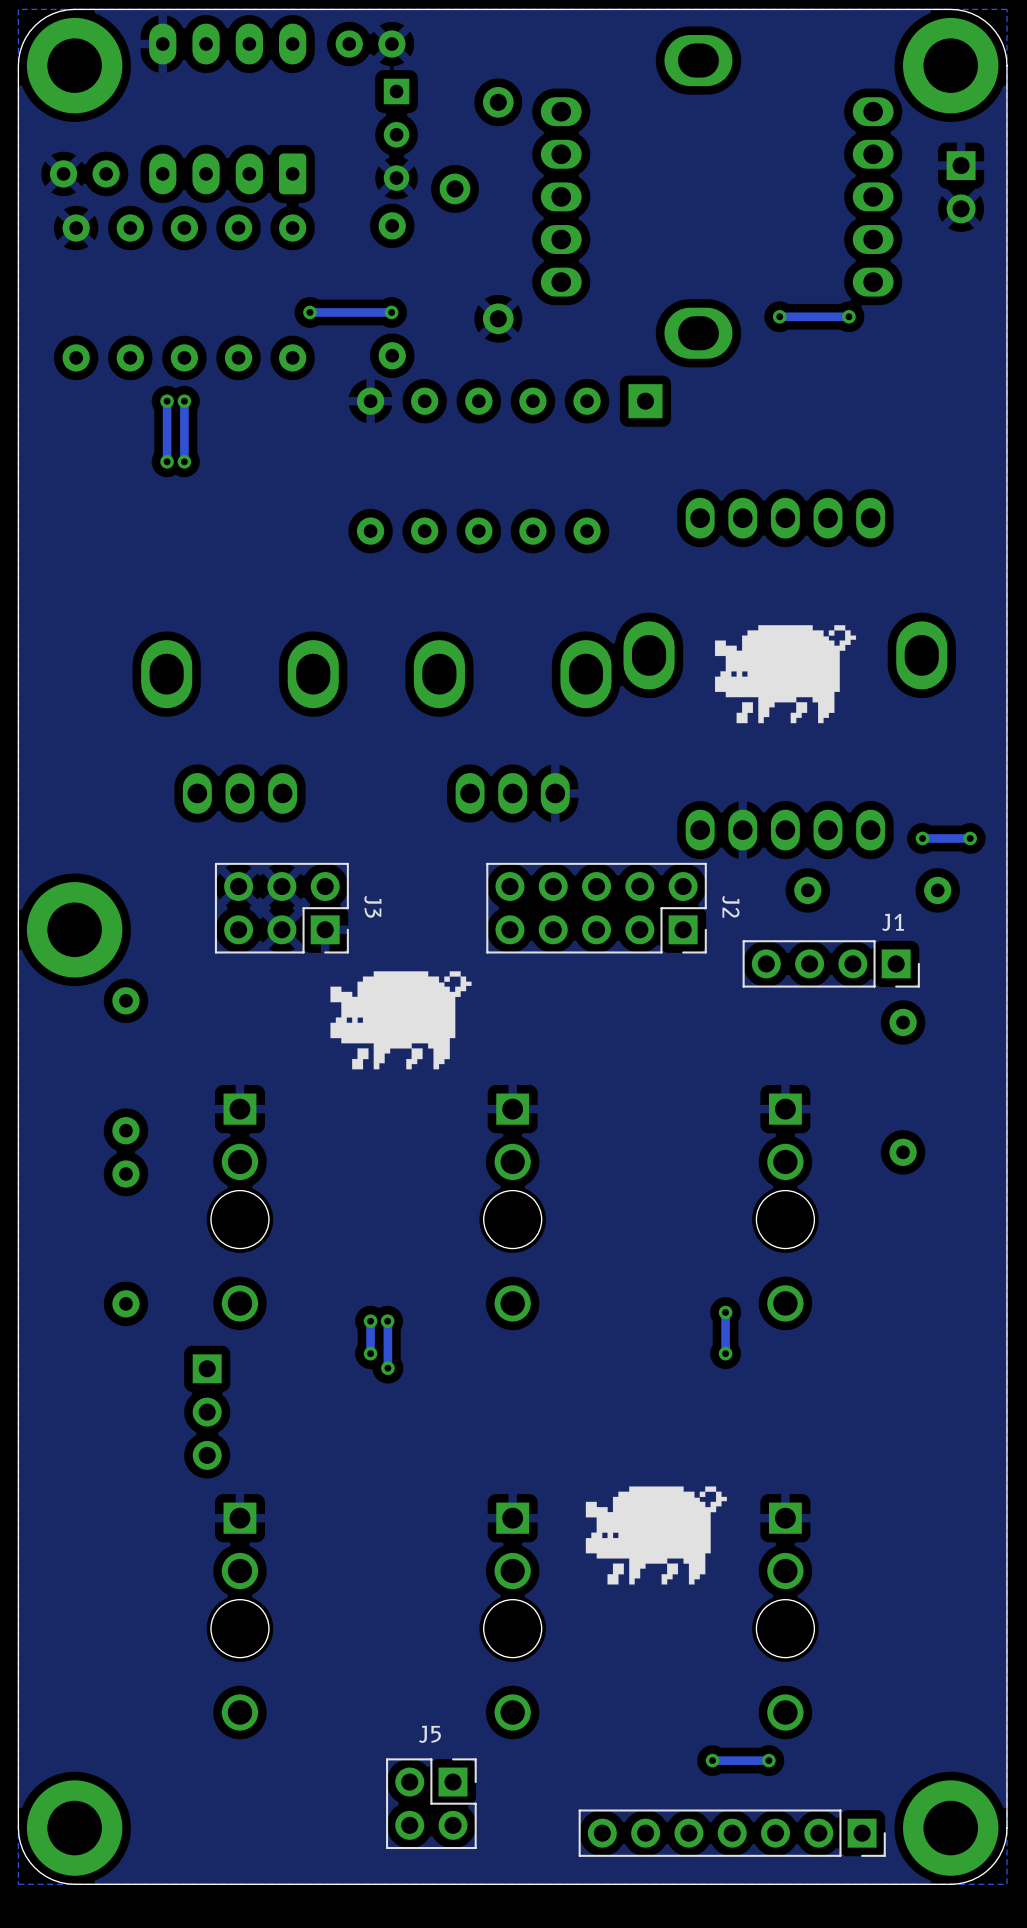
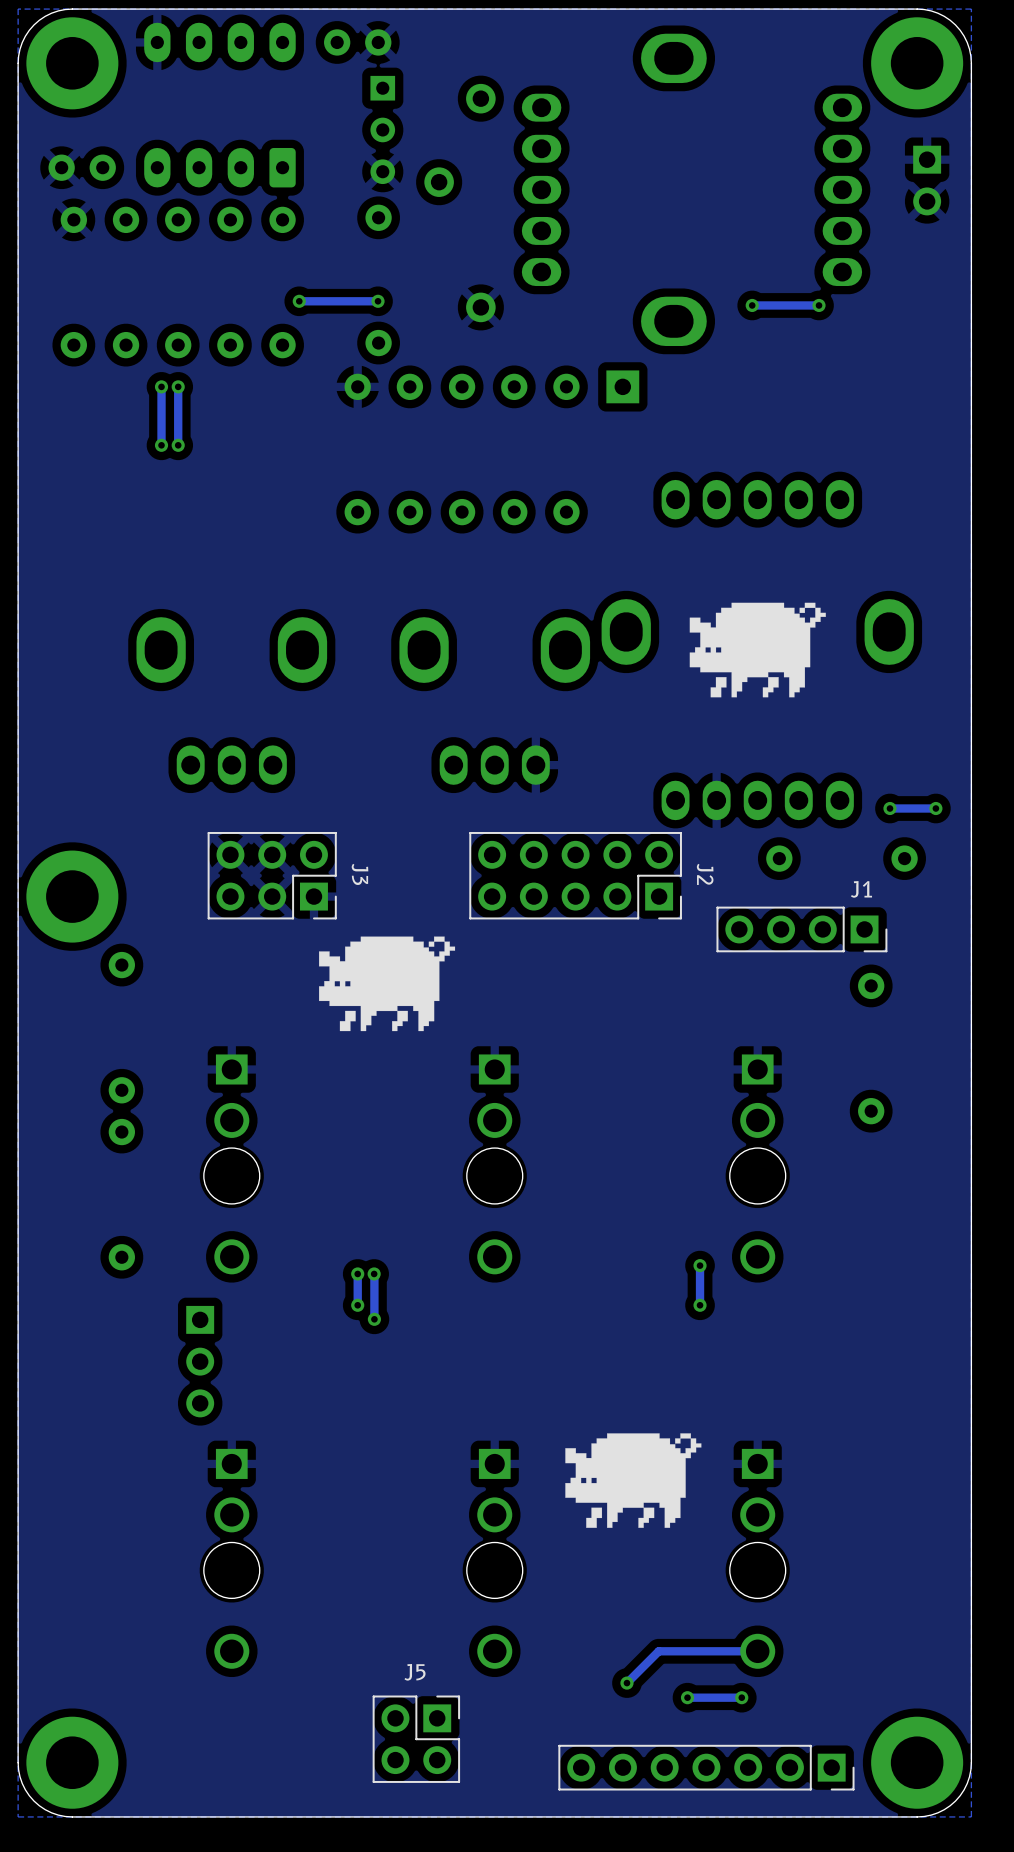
track: none -> (757, 1651) (658, 1651) (626, 1683)
via: none -> (626, 1683)

